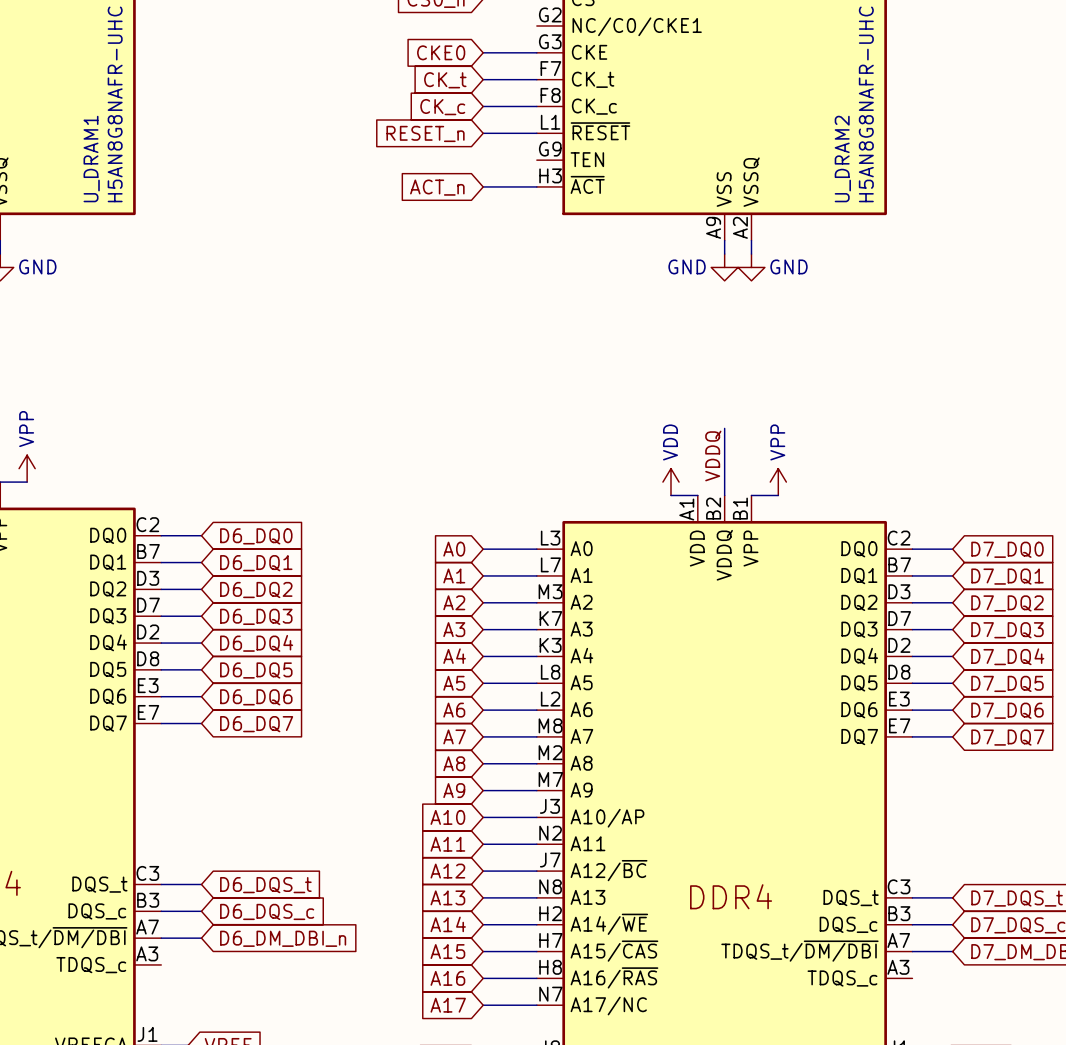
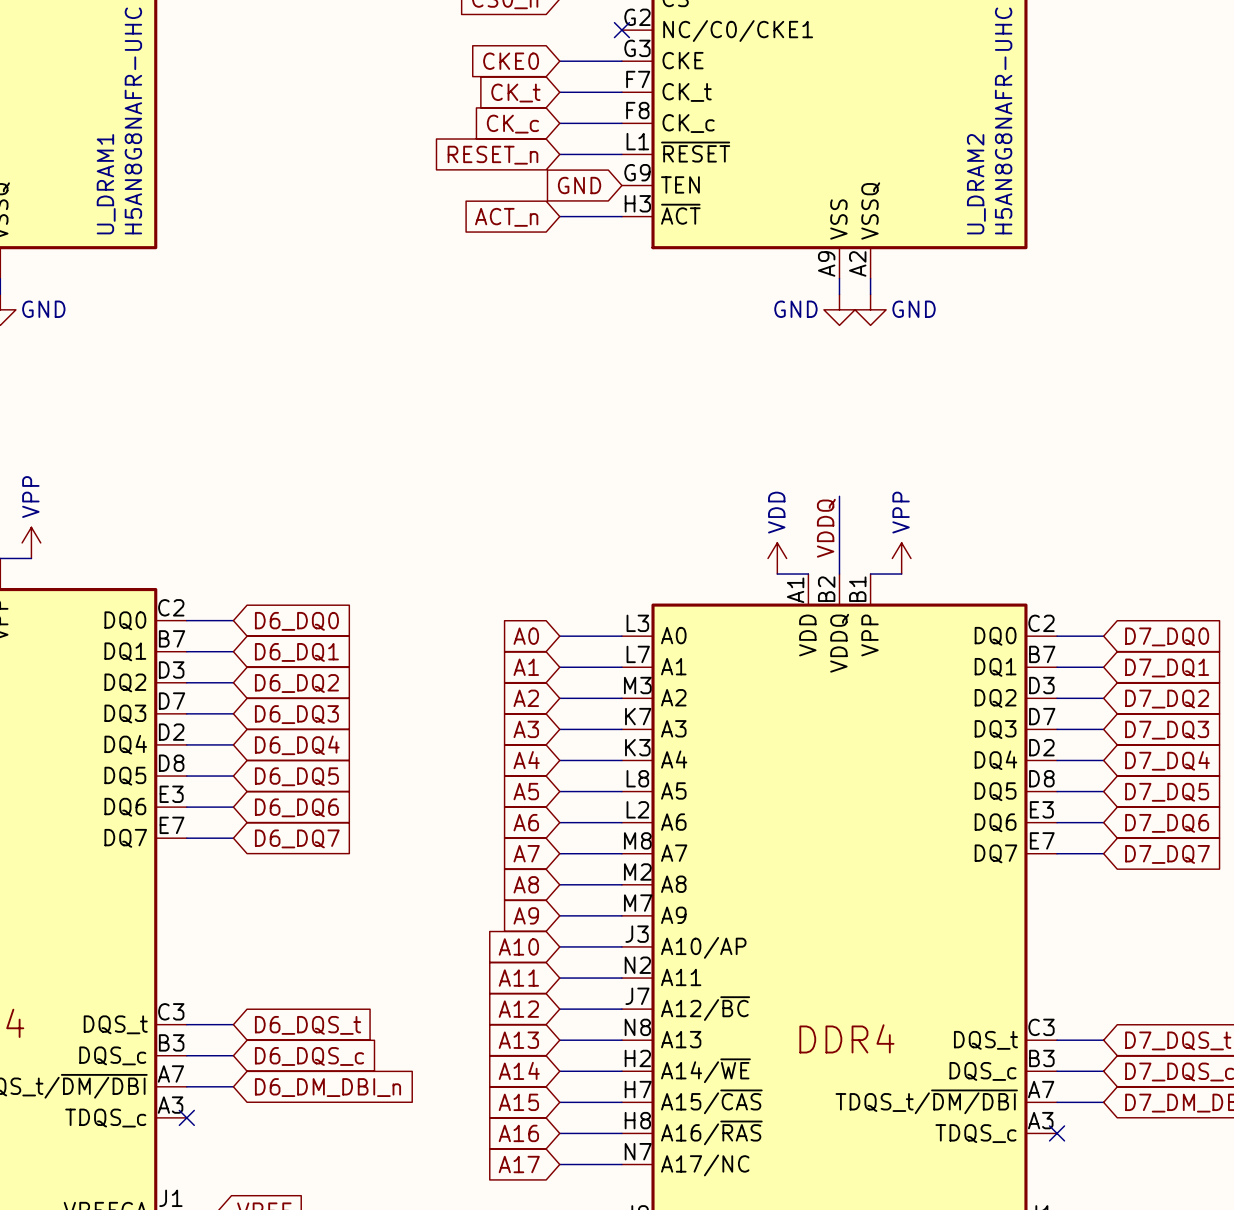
no-connect mark: none -> (621, 30)
global label: none -> GND (579, 185)
no-connect mark: none -> (186, 1117)
no-connect mark: none -> (1057, 1133)

